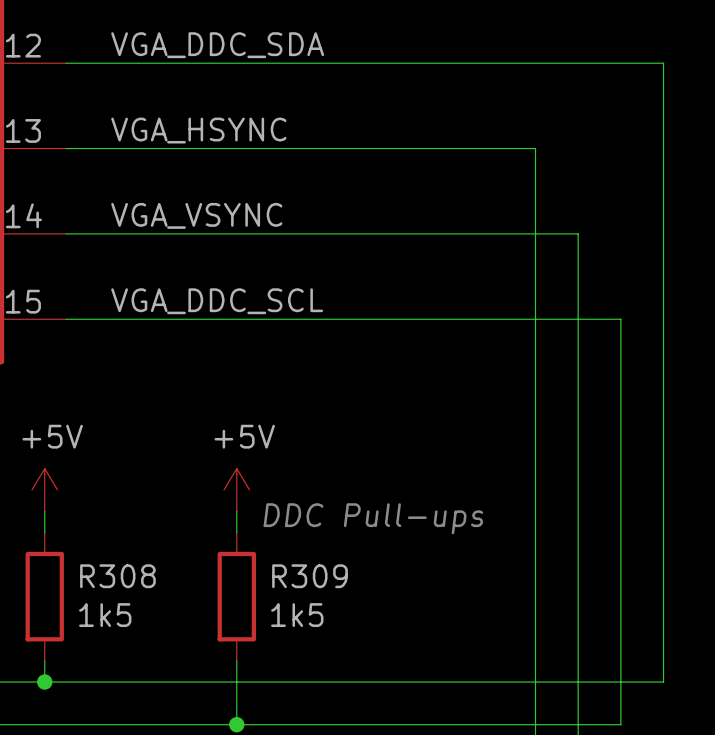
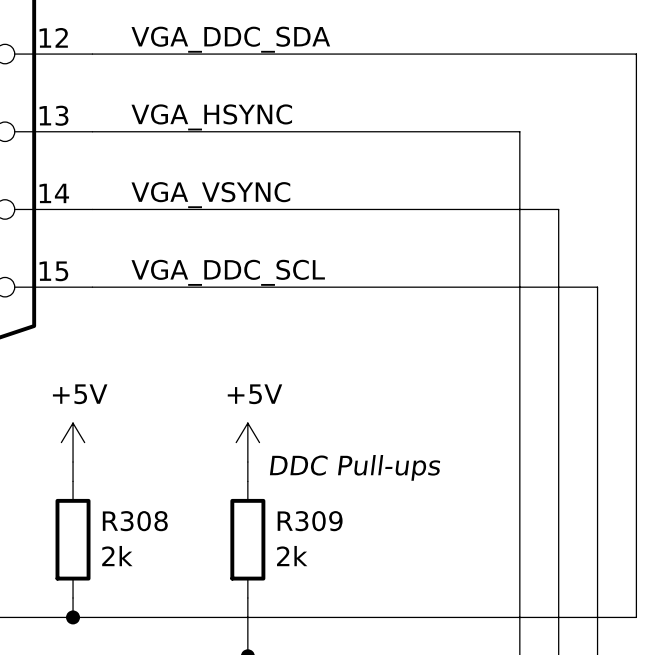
R308 value: 1k5 (105, 615) -> 2k (117, 556)
R309 value: 1k5 (297, 615) -> 2k (292, 556)

